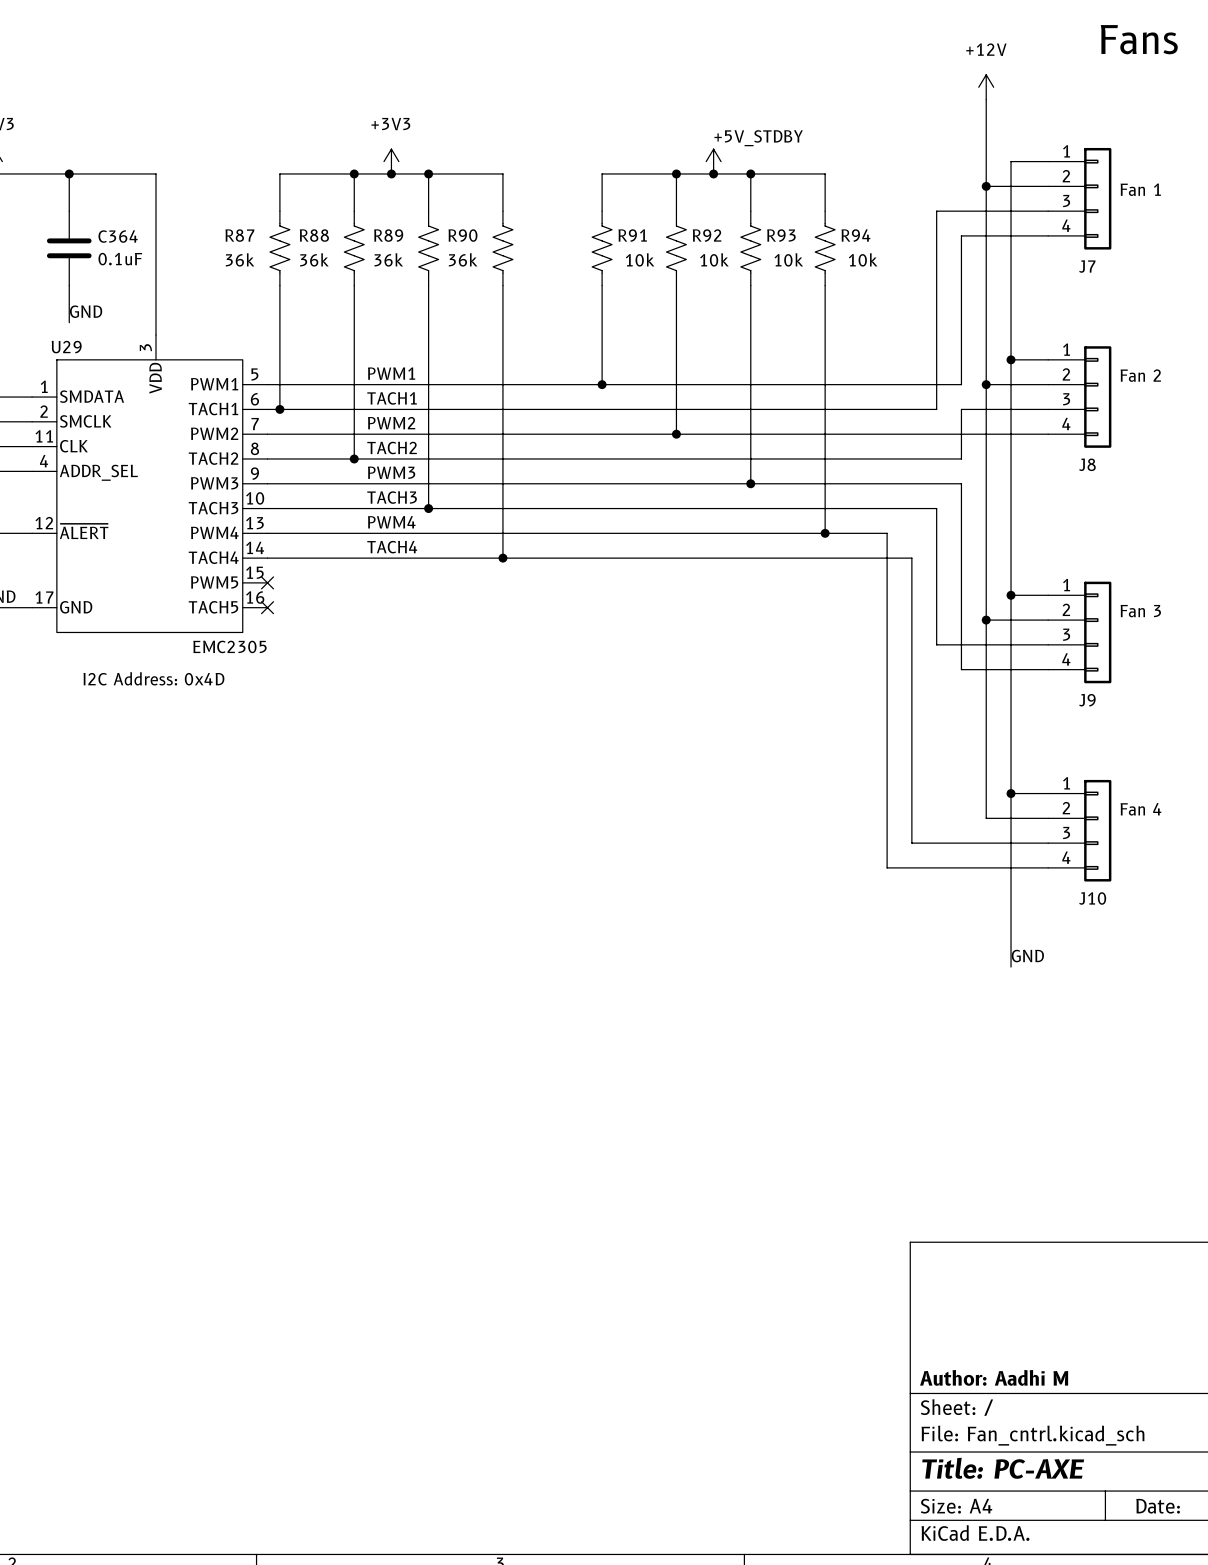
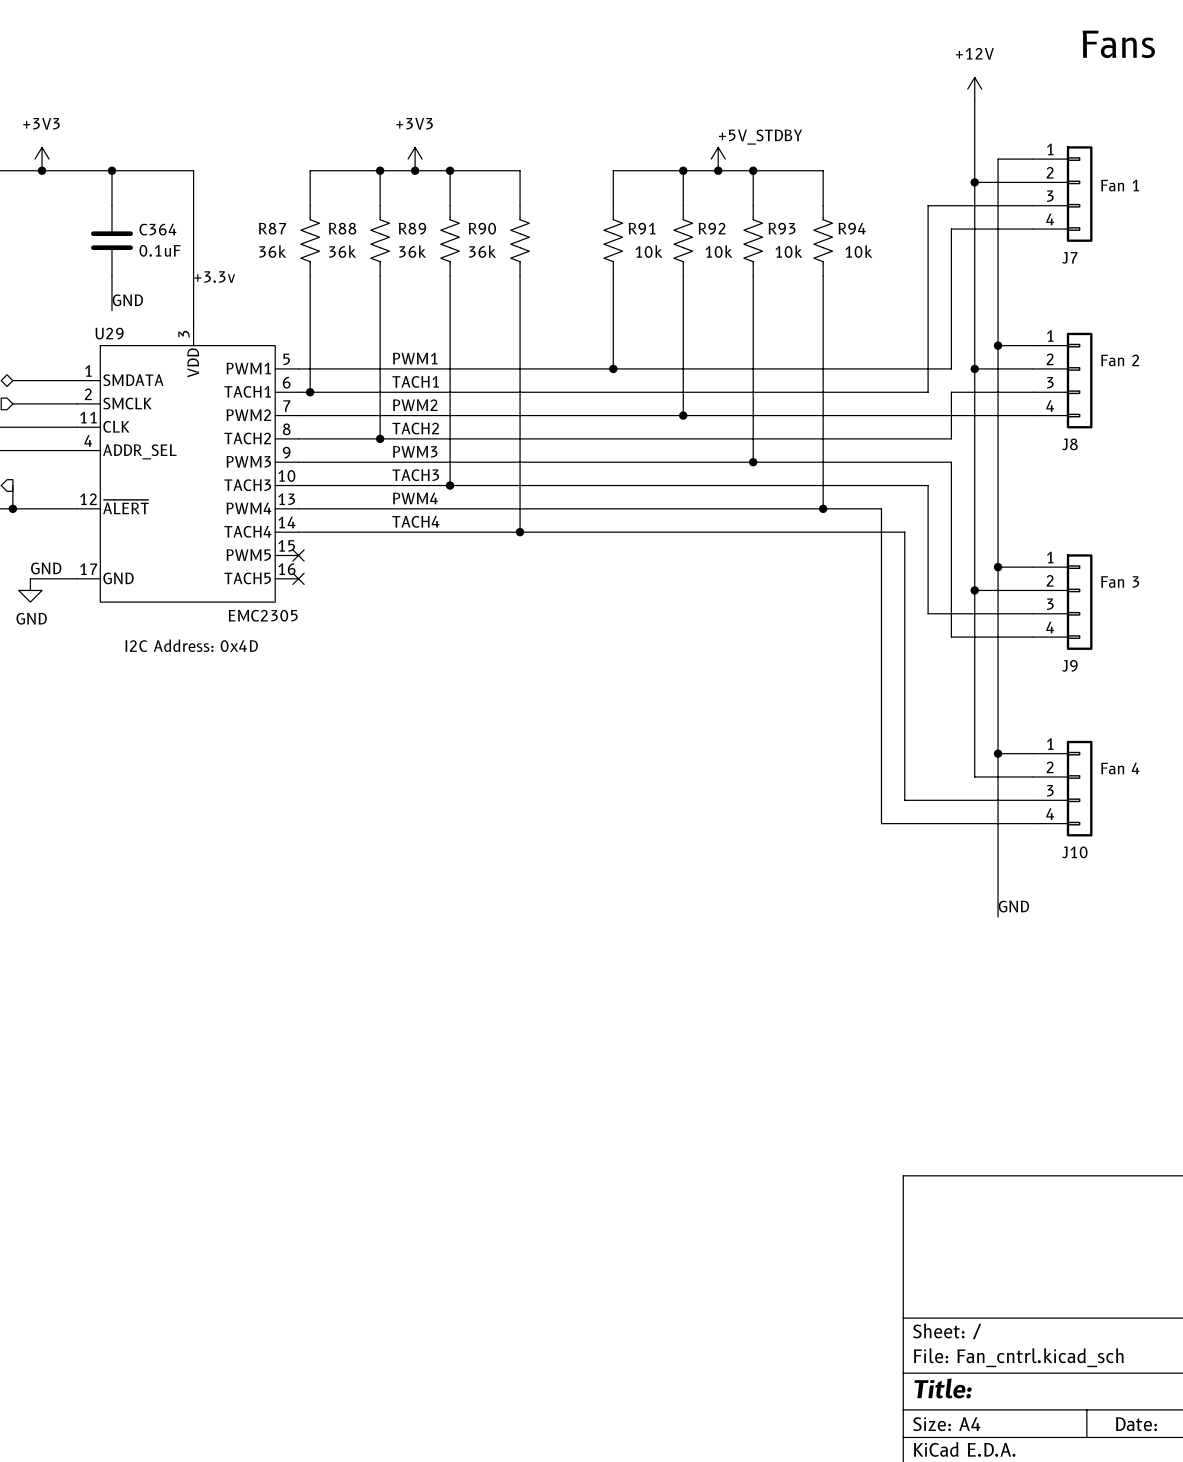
label: none -> +3.3v (214, 277)
title block: Author: Aadhi M (994, 1377) -> none
title block: Title: PC-AXE (1003, 1468) -> Title: (943, 1388)

